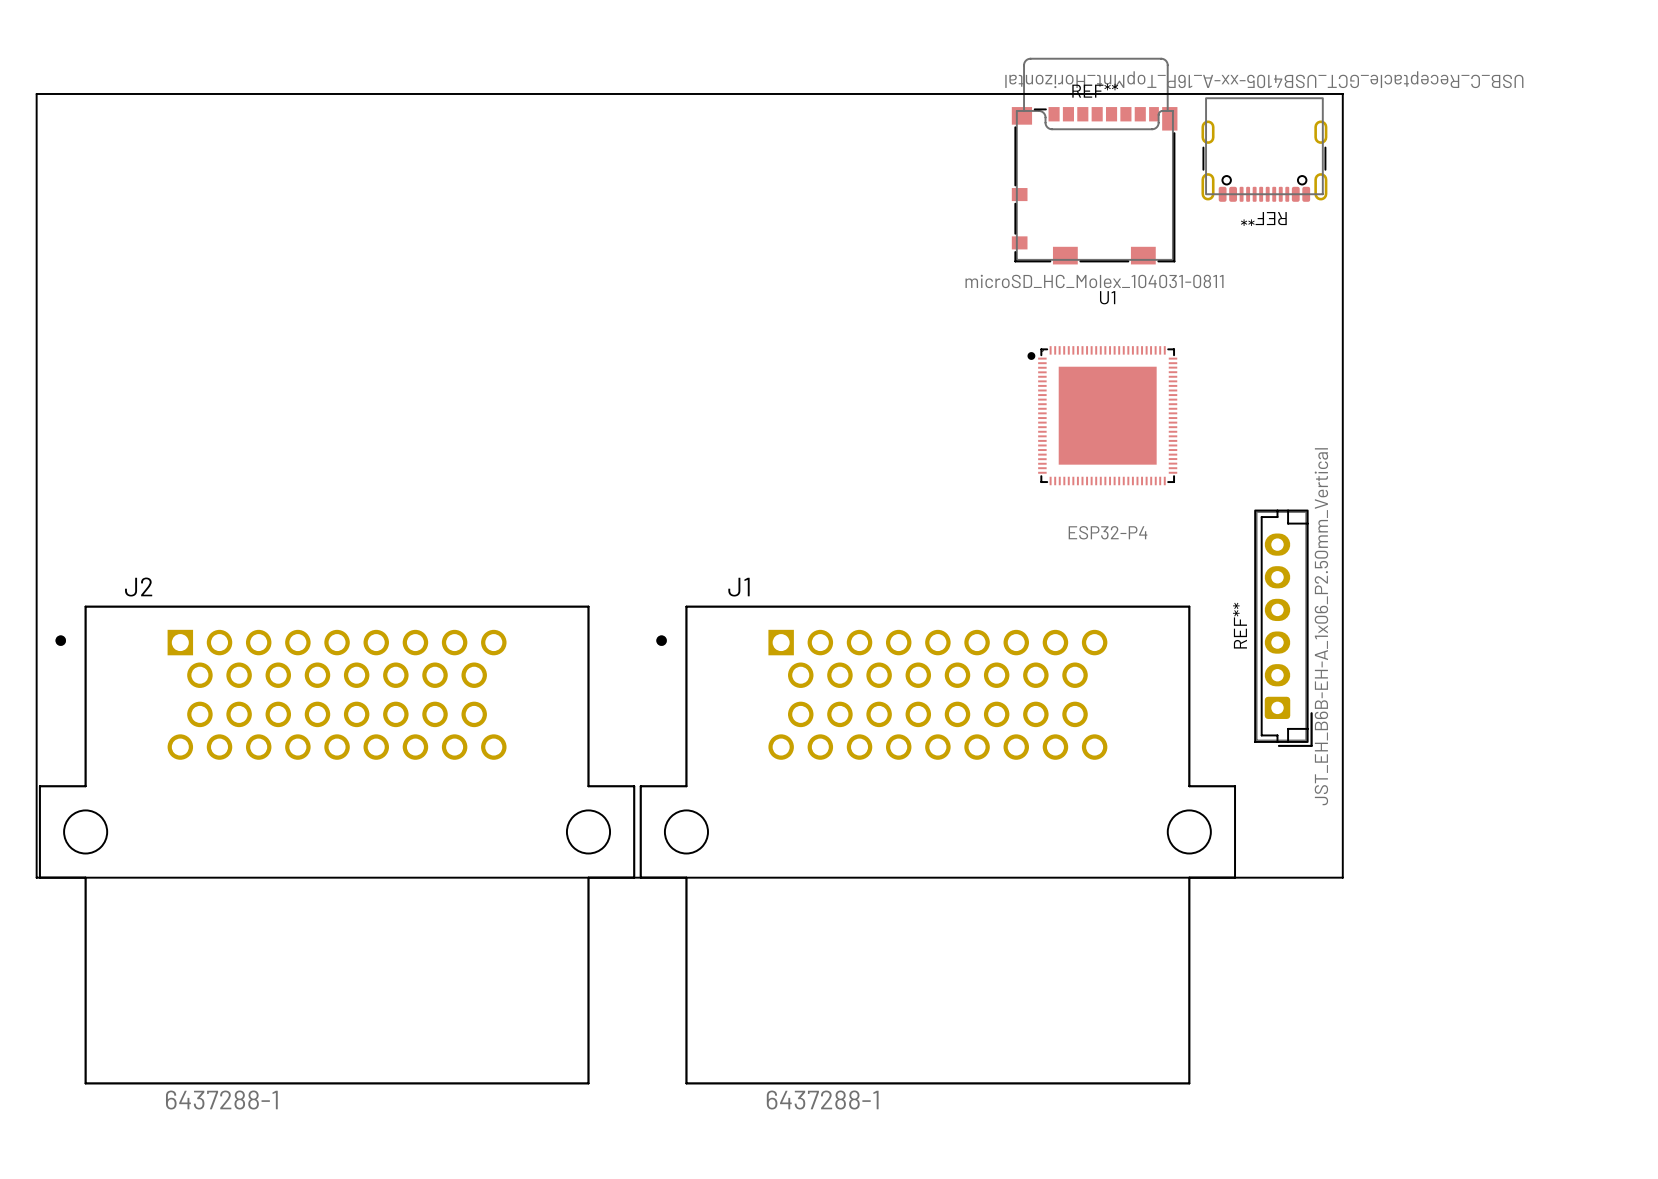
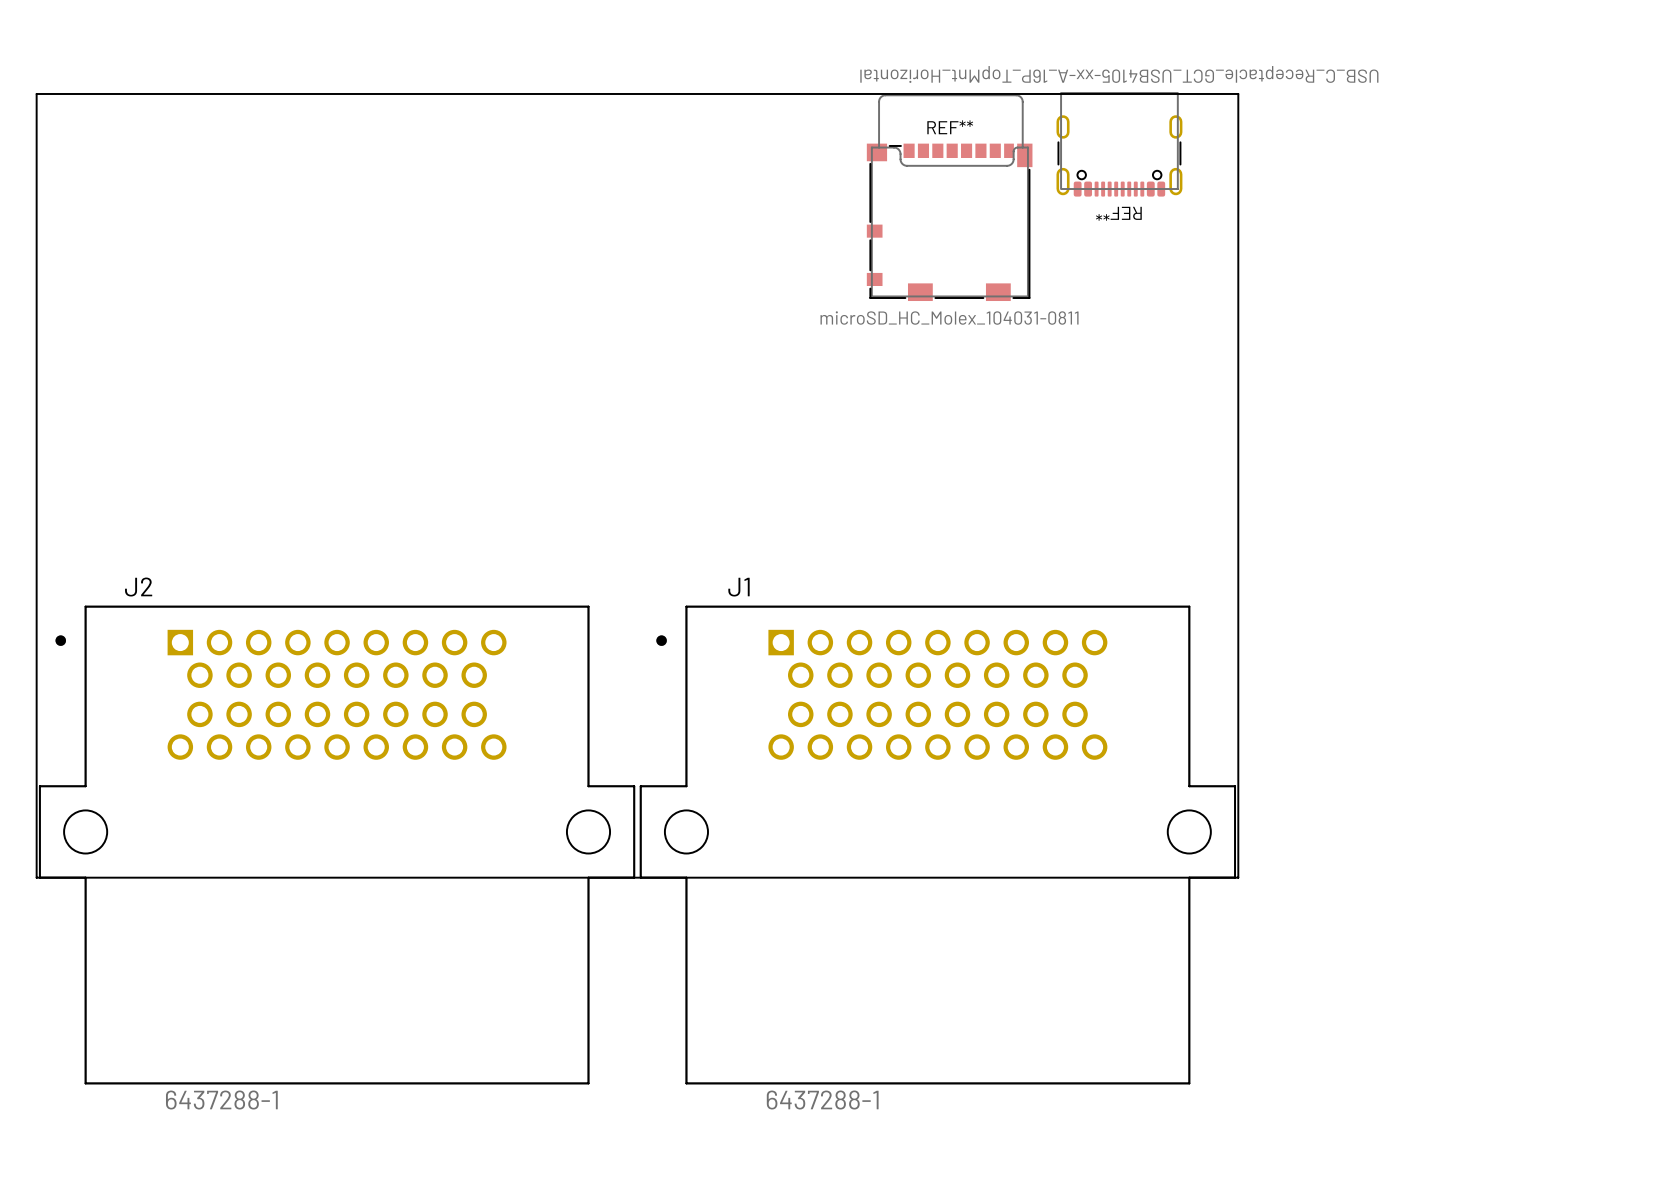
board edge: (1238, 93) (1342, 93) (1342, 877) (1238, 877) -> (1238, 93) (1238, 877)
REF** position: (1264, 149) -> (1119, 144)
REF** position: (1094, 161) -> (949, 197)
U1: ESP32-P4 (1102, 415) -> none
REF**: JST_EH_B6B-EH-A_1x06_P2.50mm_Vertical (1283, 628) -> none

